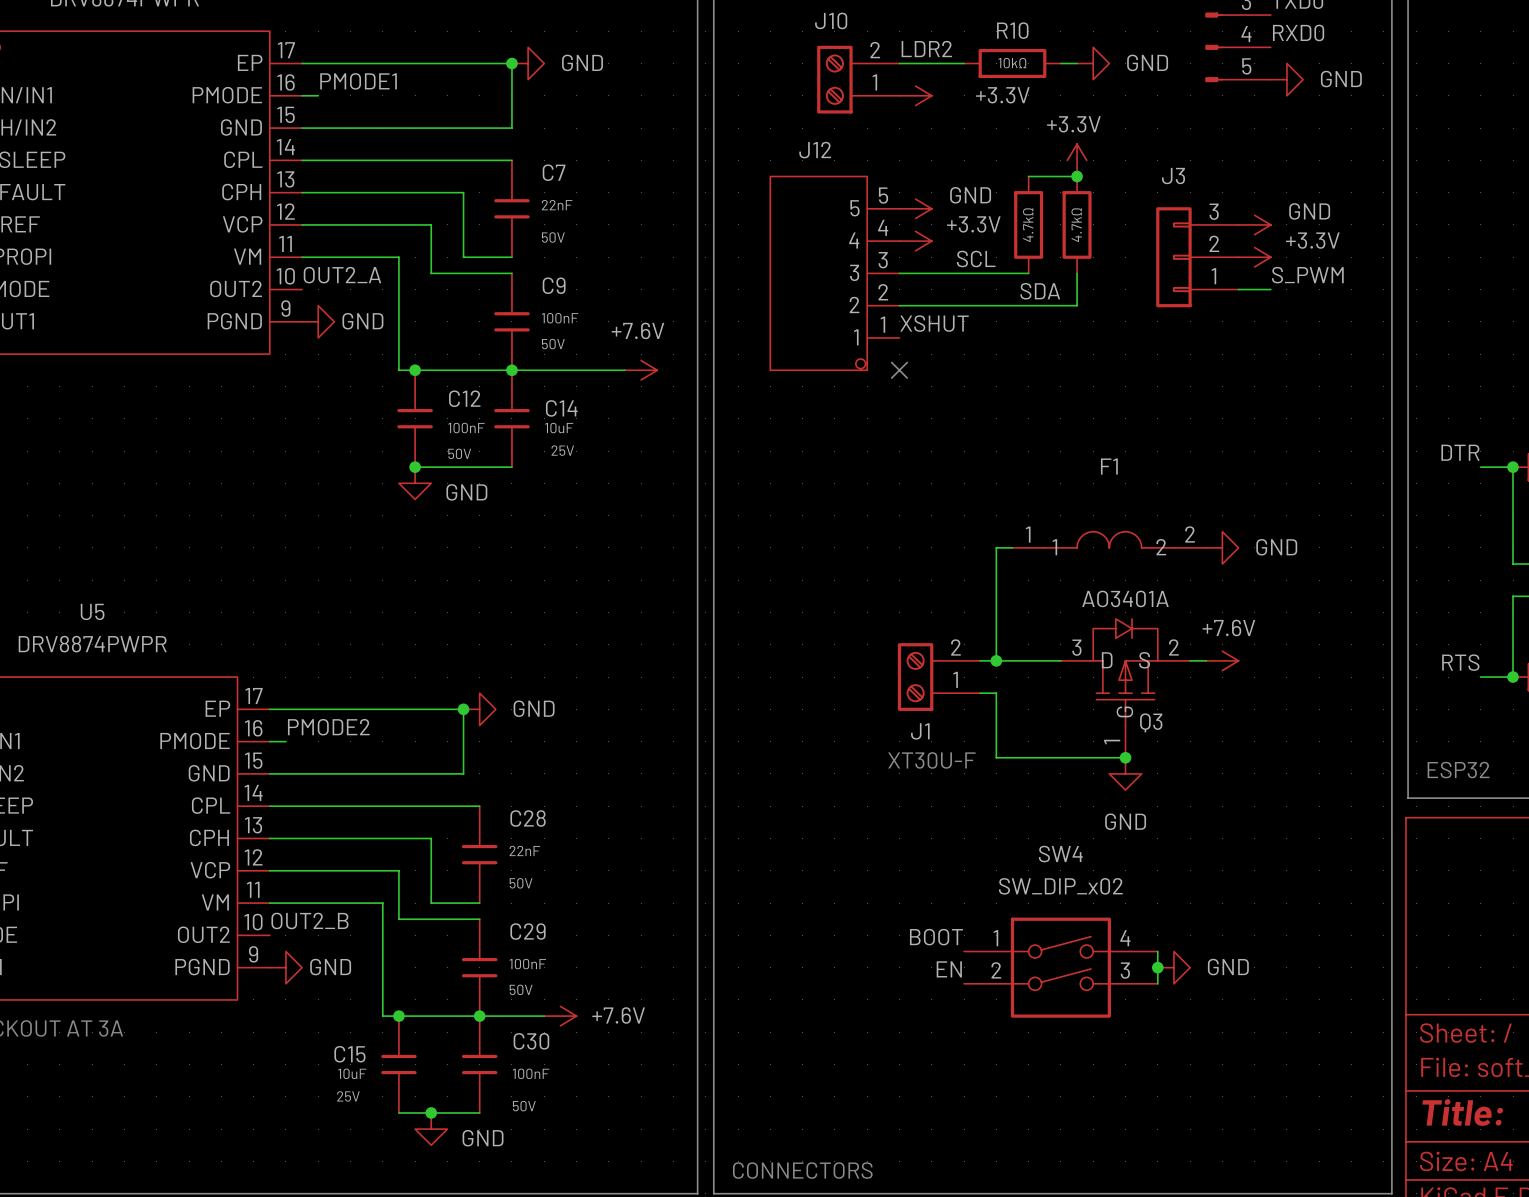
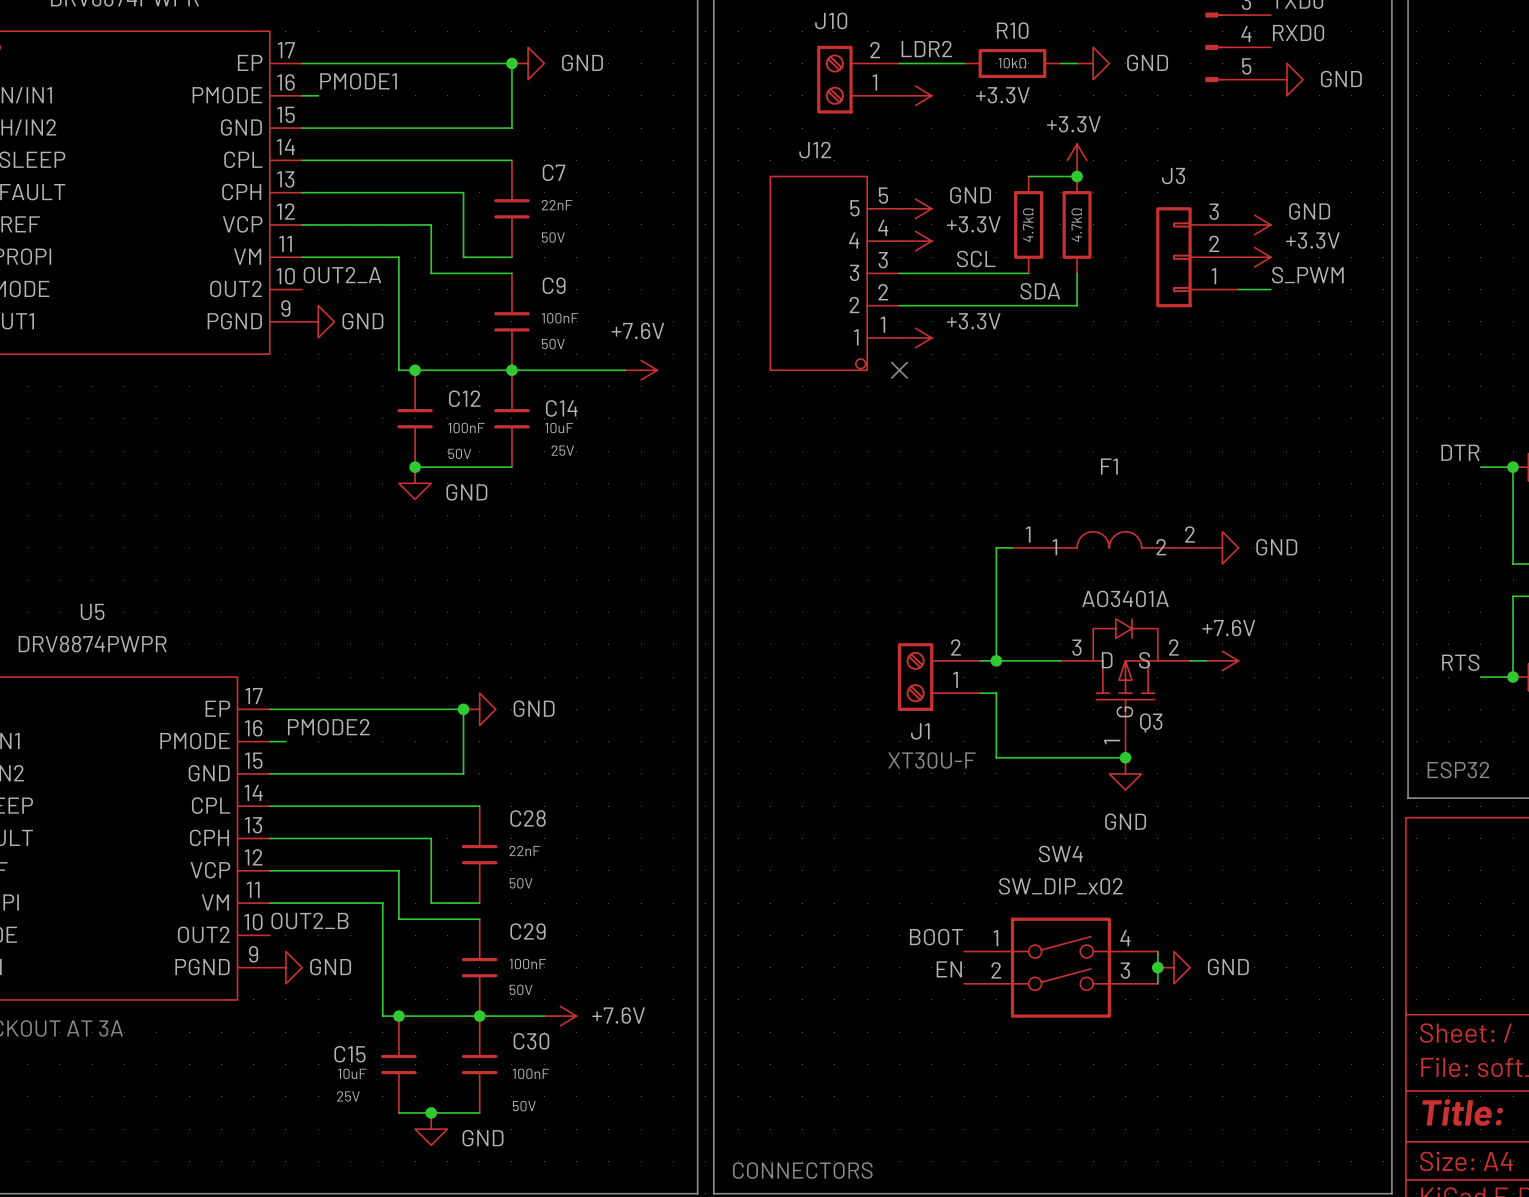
label: XSHUT (934, 323) -> none
power symbol: none -> +3.3V (915, 337)

